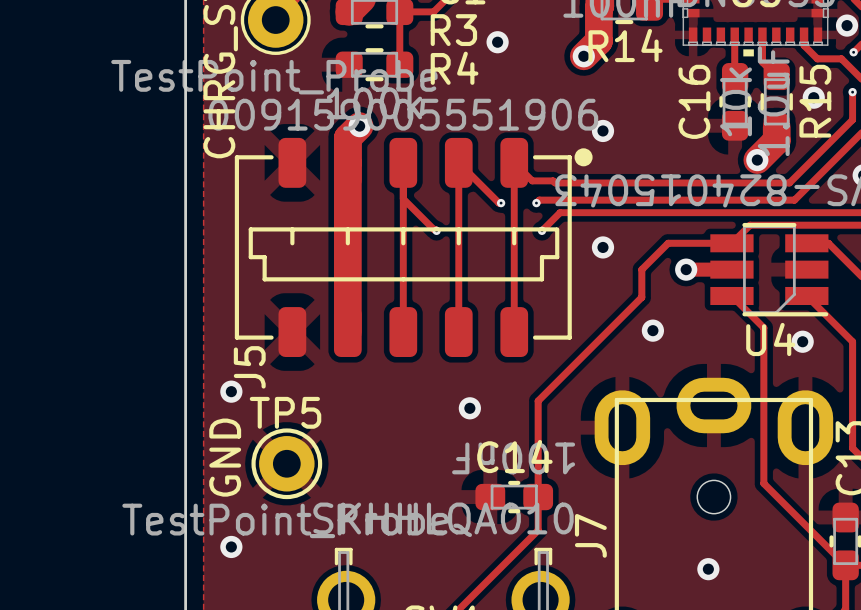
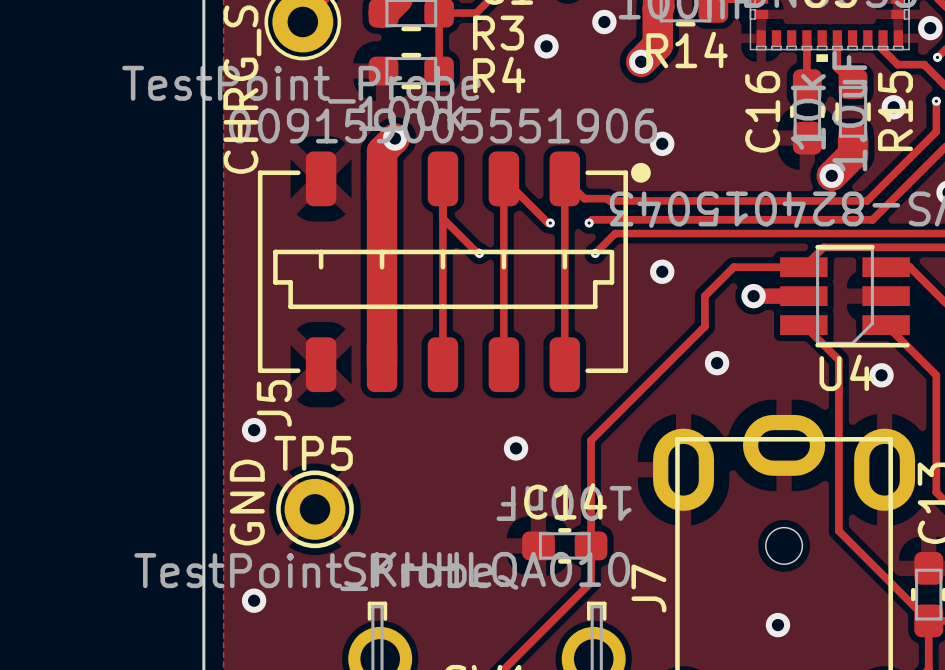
via: none -> (604, 22)

